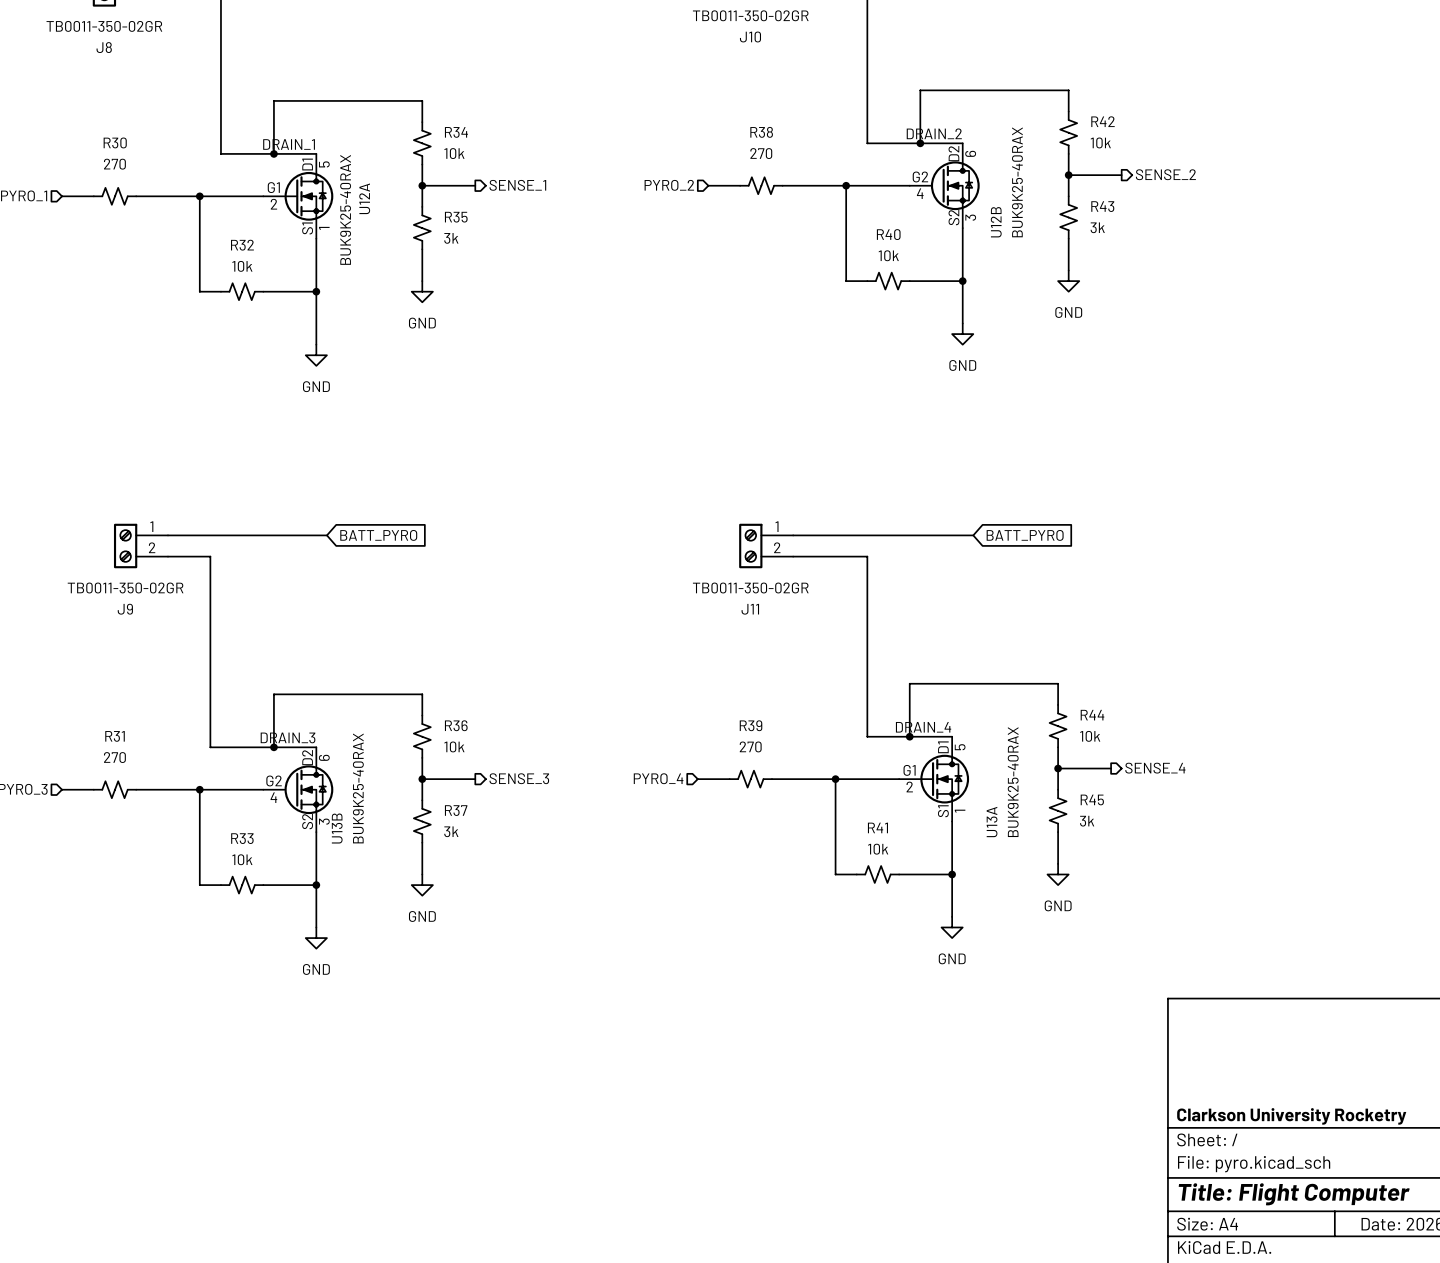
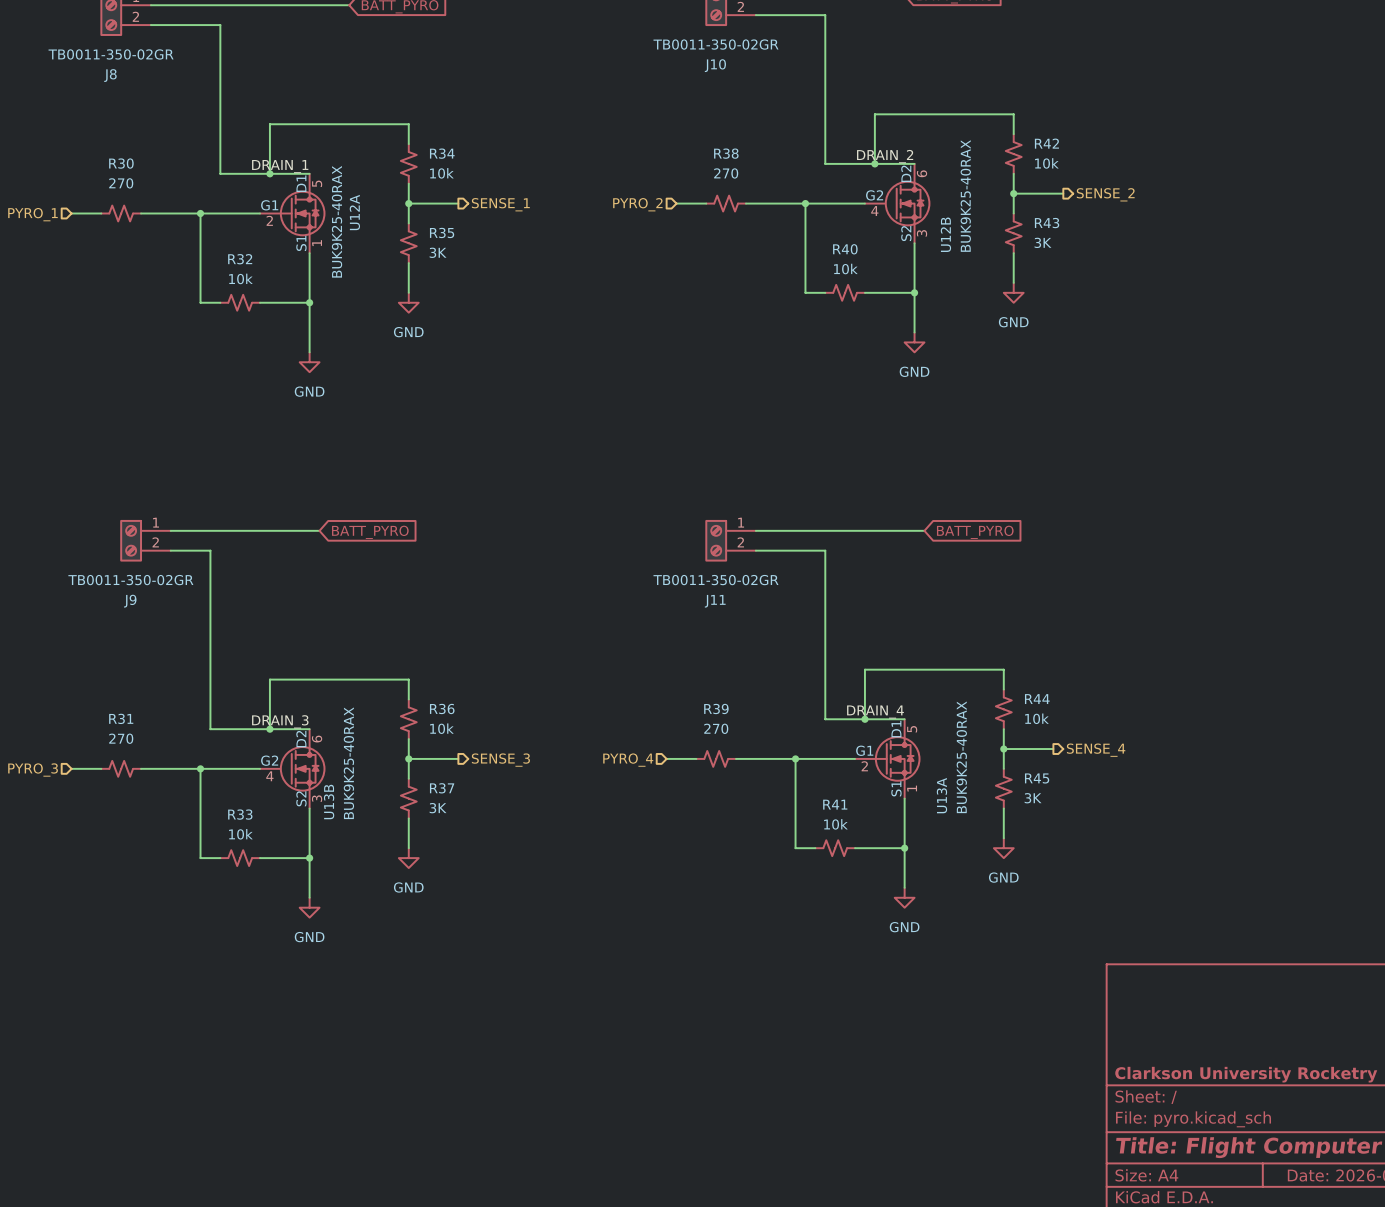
R43 value: 3k (1097, 227) -> 3K (1043, 242)
R35 value: 3k (451, 238) -> 3K (438, 252)
R45 value: 3k (1087, 821) -> 3K (1033, 798)
R37 value: 3k (451, 831) -> 3K (438, 808)

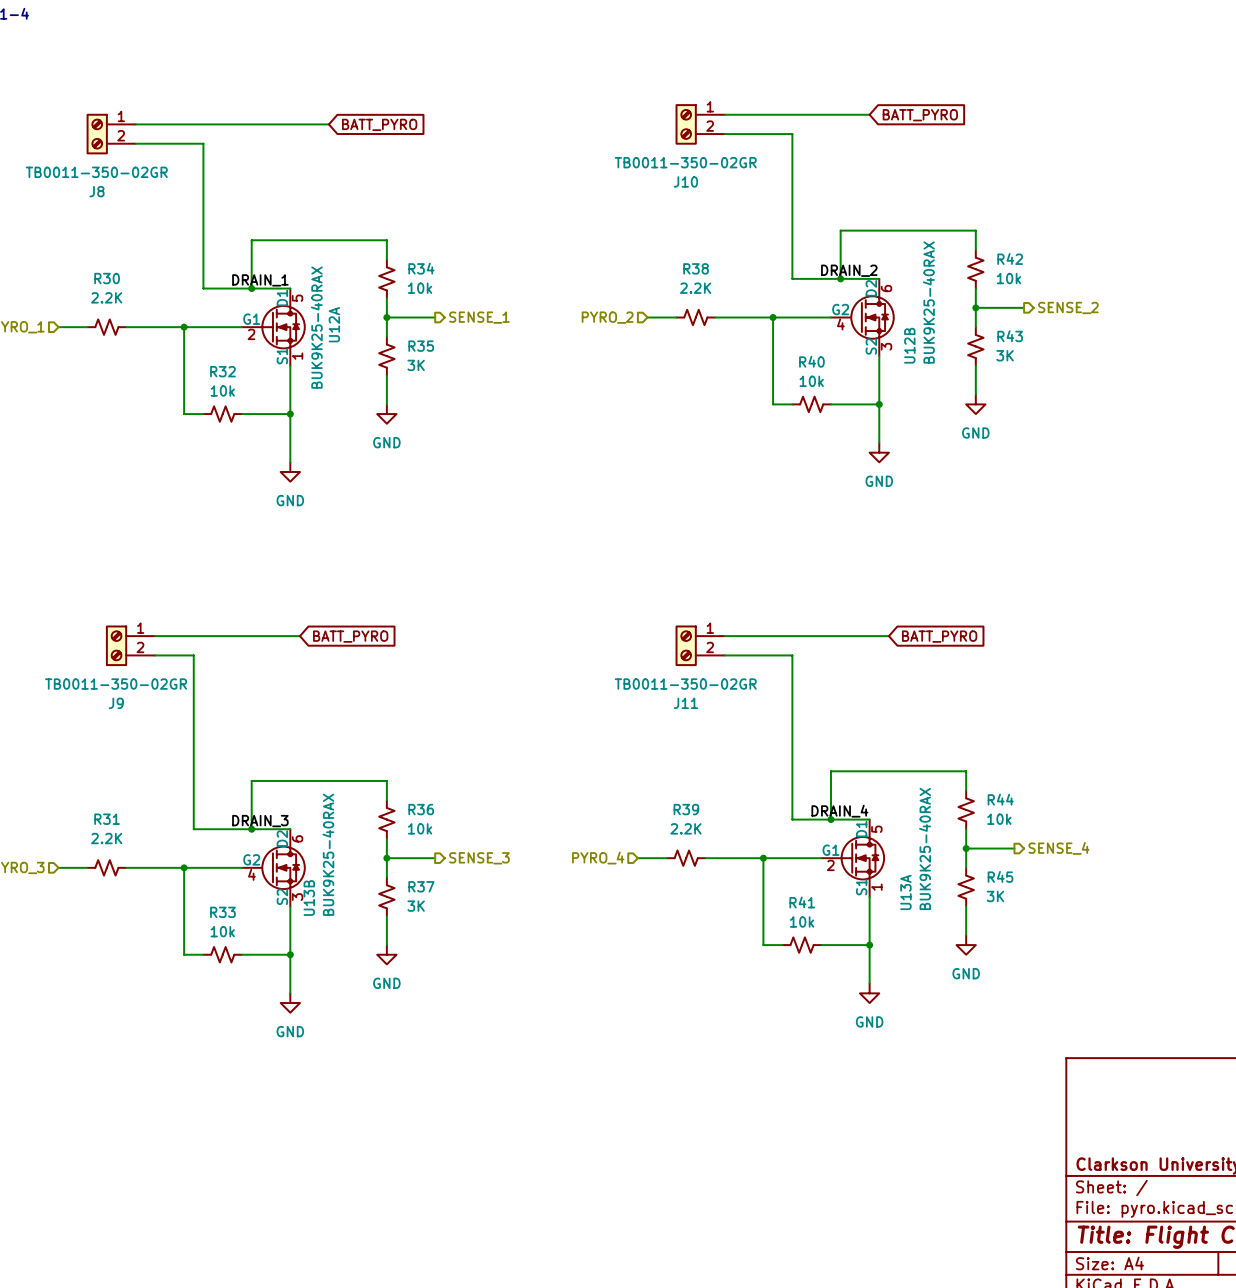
R38 value: 270 (726, 173) -> 2.2K (695, 288)
R30 value: 270 (121, 183) -> 2.2K (106, 297)
R39 value: 270 (716, 728) -> 2.2K (685, 828)
R31 value: 270 (121, 738) -> 2.2K (106, 838)

